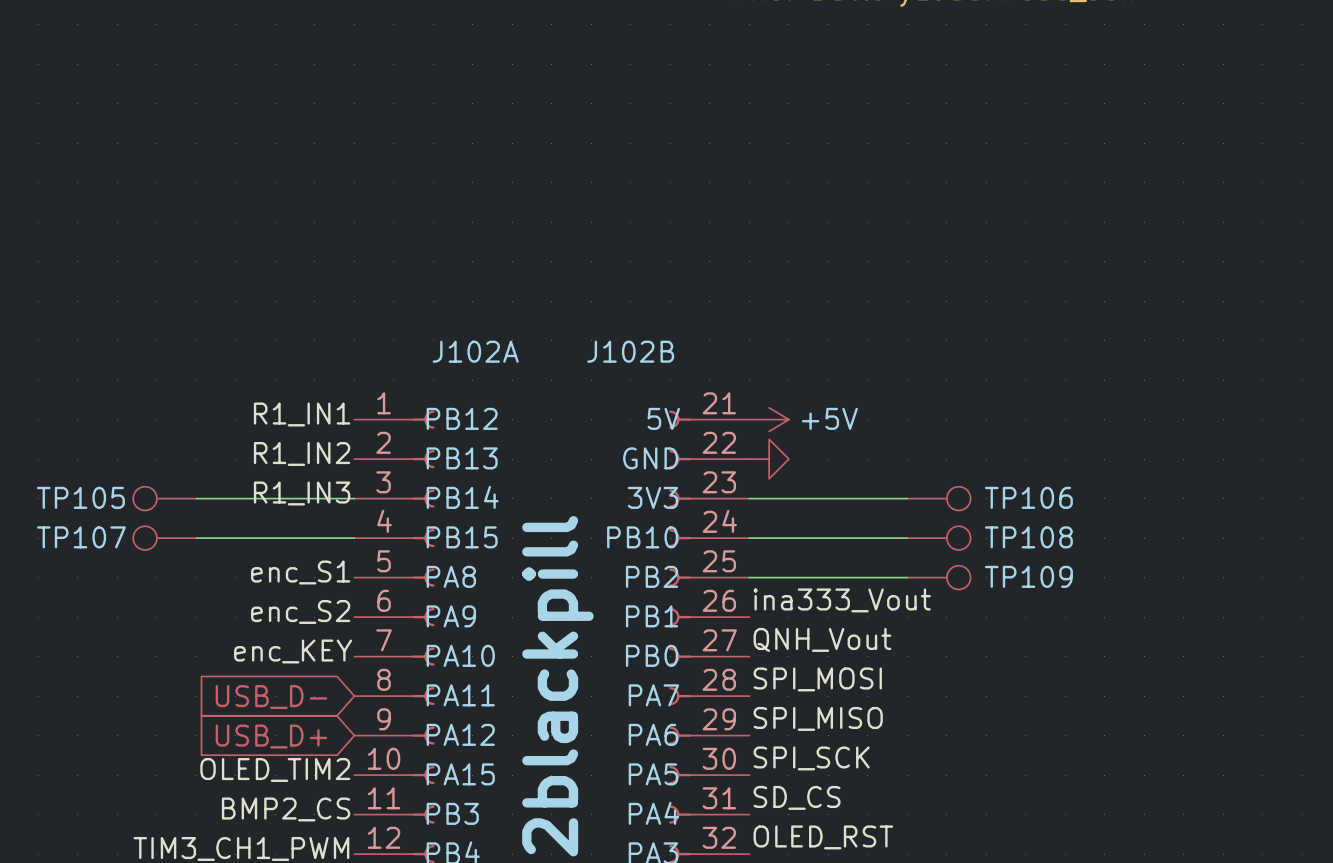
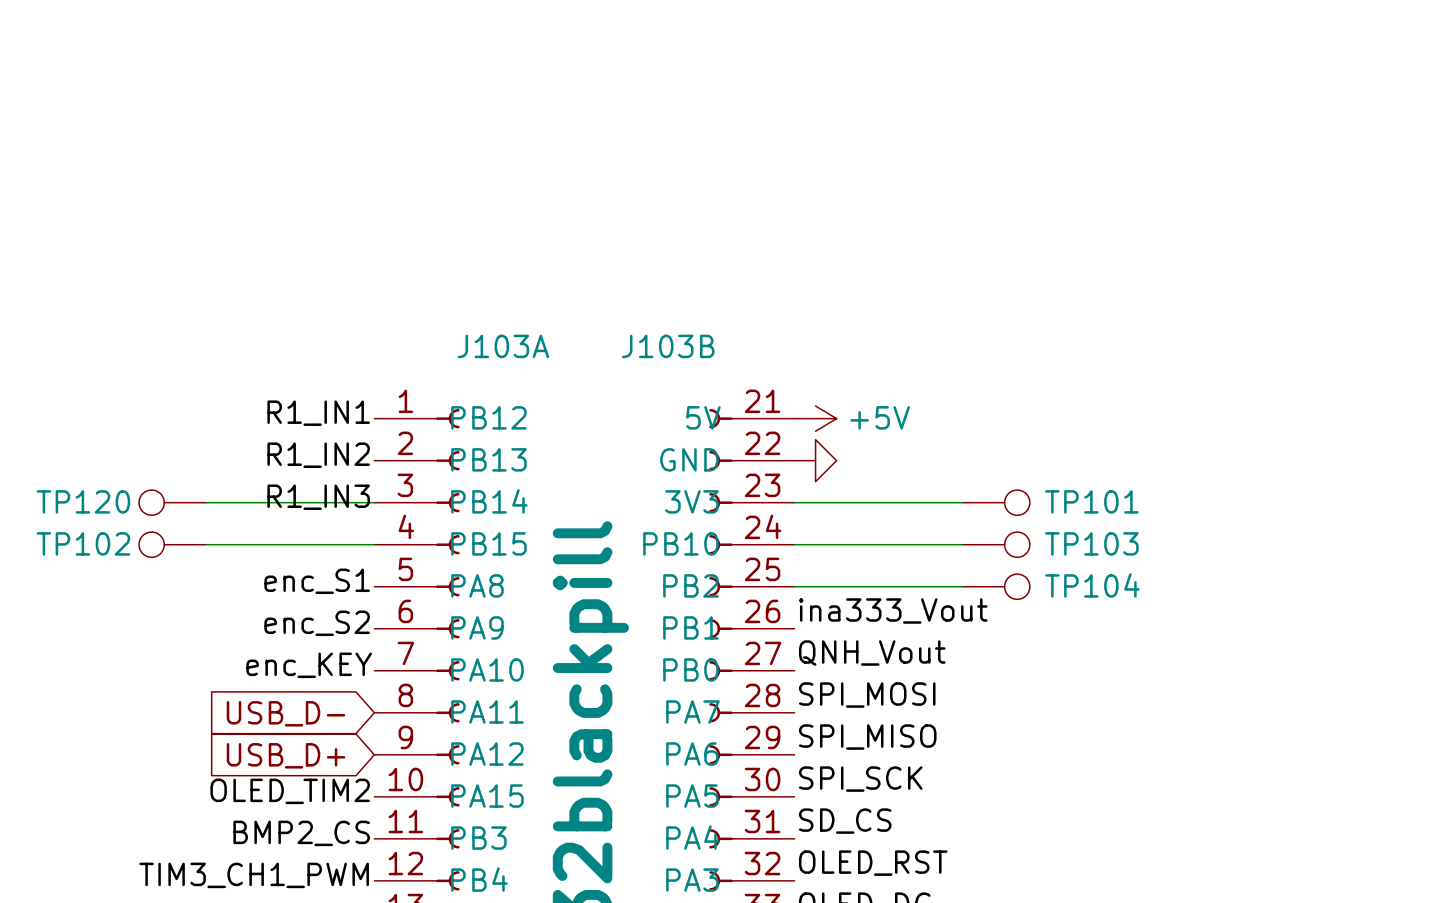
J102A name: J102A (475, 351) -> J103A (503, 346)
J102B name: J102B (630, 351) -> J103B (668, 346)
TP105 name: TP105 (80, 497) -> TP120 (83, 501)
TP106 name: TP106 (1028, 497) -> TP101 (1091, 501)
TP107 name: TP107 (81, 537) -> TP102 (83, 543)
TP108 name: TP108 (1028, 537) -> TP103 (1091, 543)
TP109 name: TP109 (1028, 576) -> TP104 (1092, 585)

